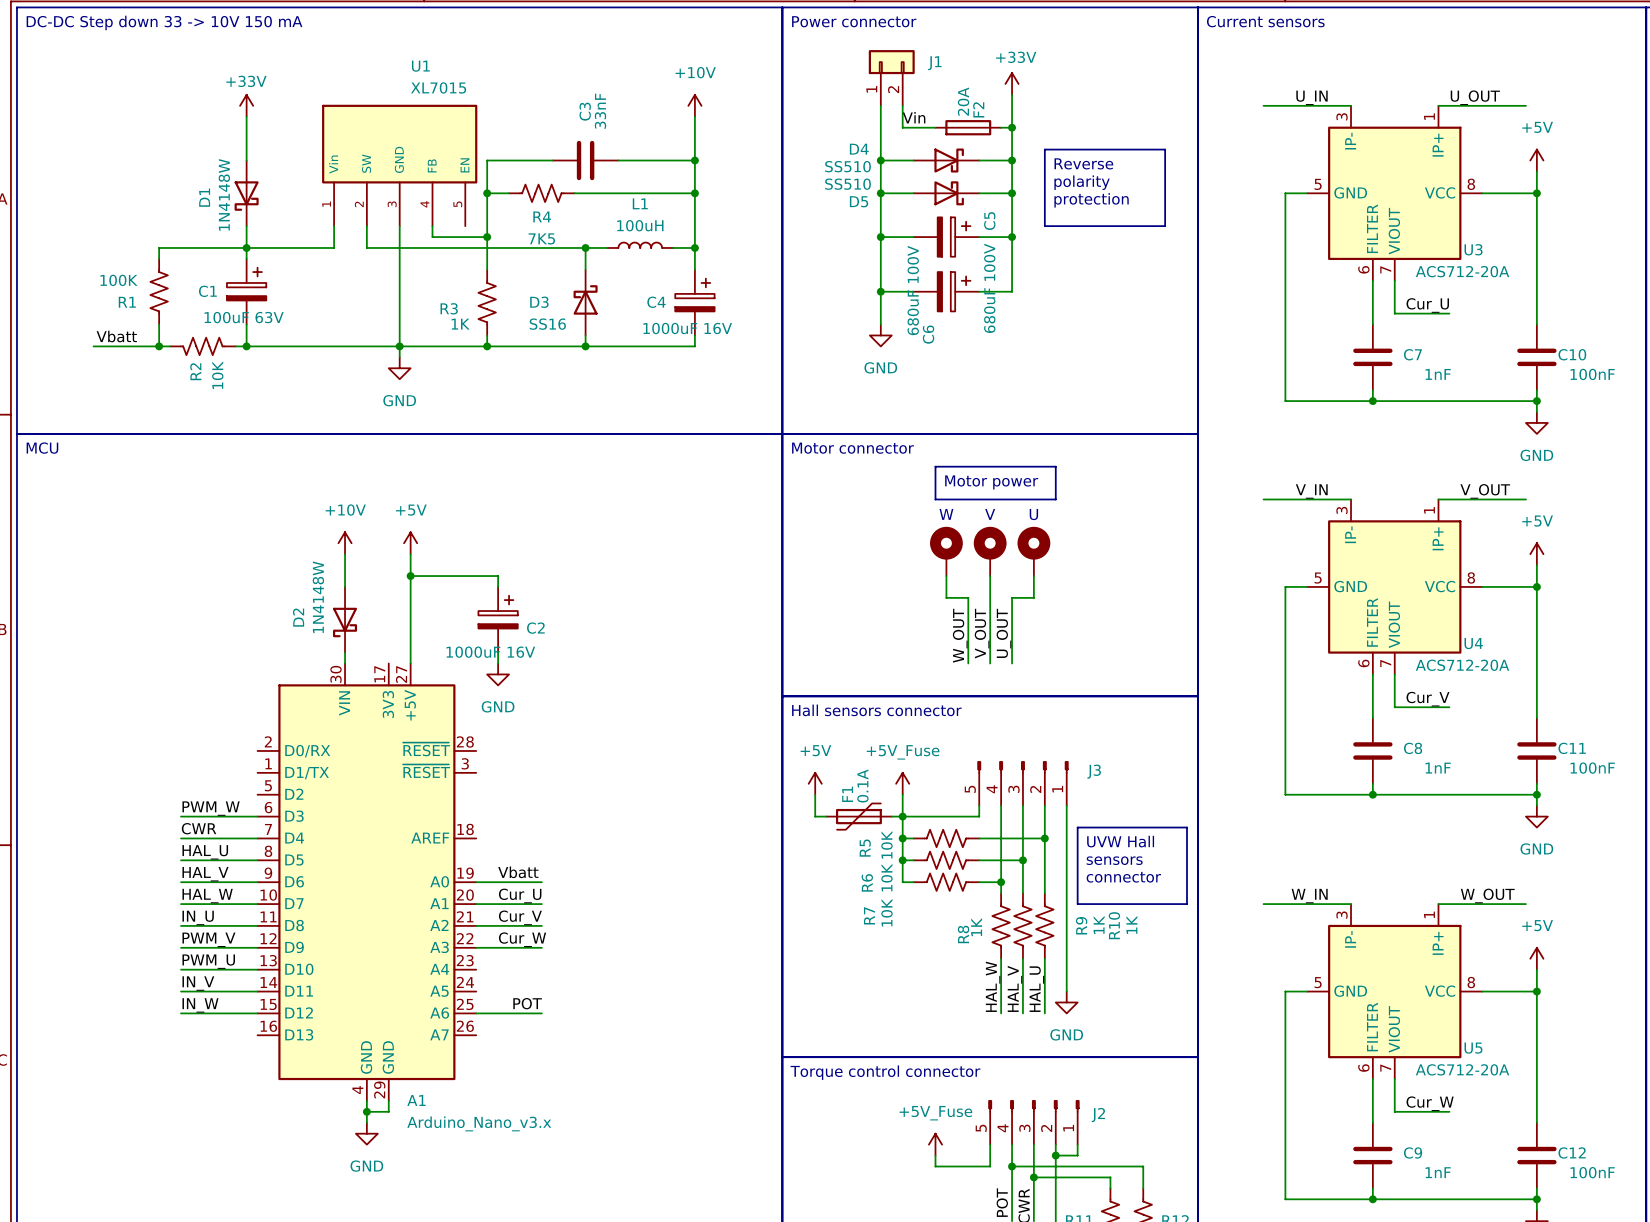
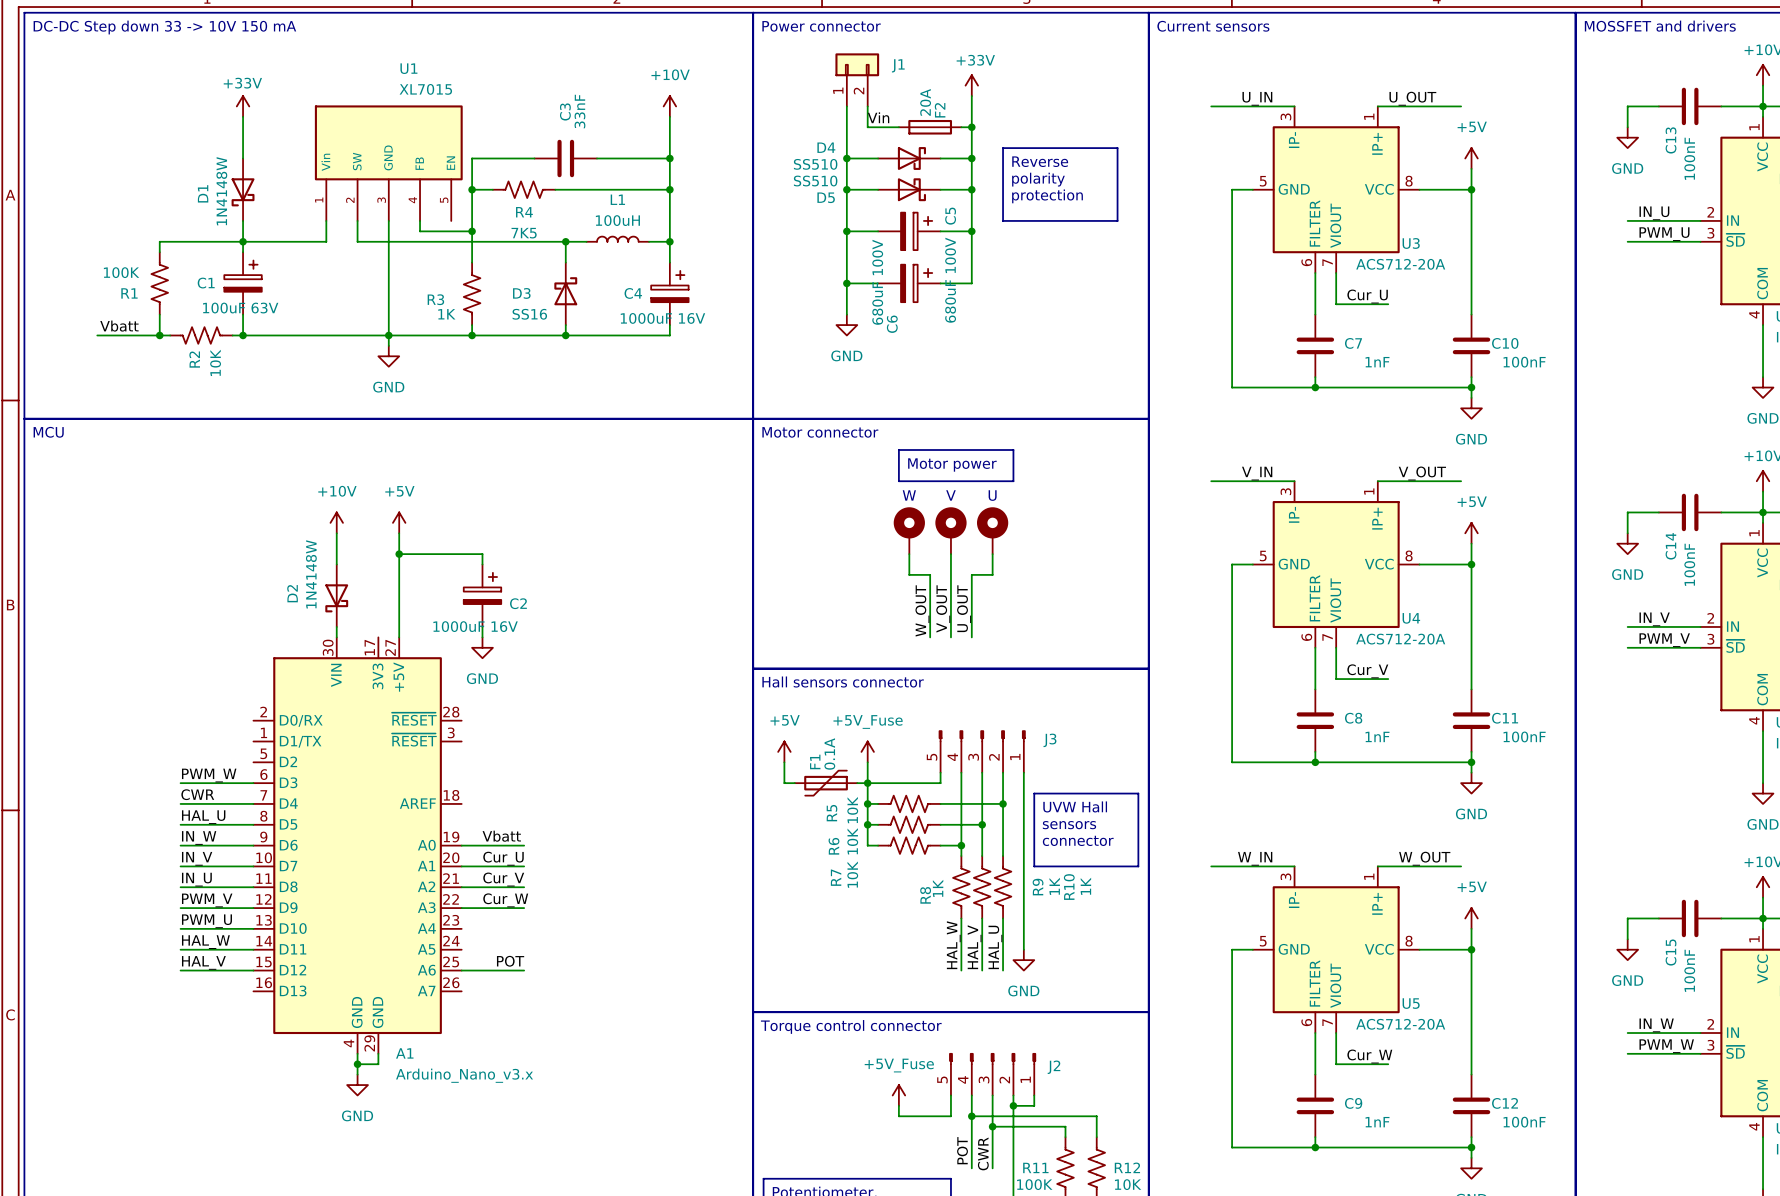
label: HAL_V (205, 874) -> IN_W (199, 838)
label: HAL_W (207, 896) -> IN_V (197, 858)
label: IN_V (198, 983) -> HAL_W (205, 942)
label: IN_W (200, 1005) -> HAL_V (203, 962)

